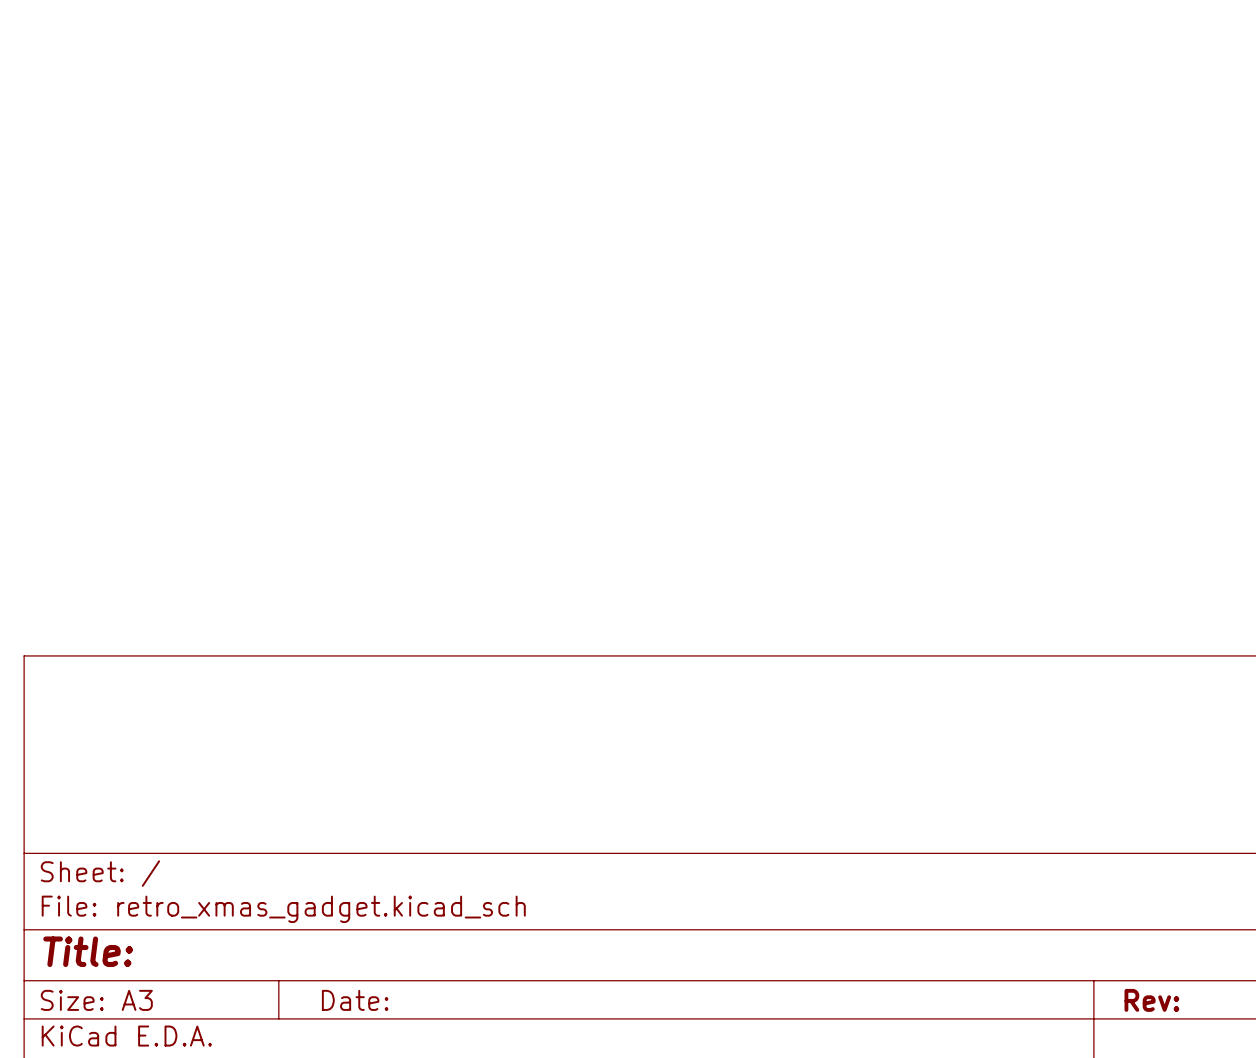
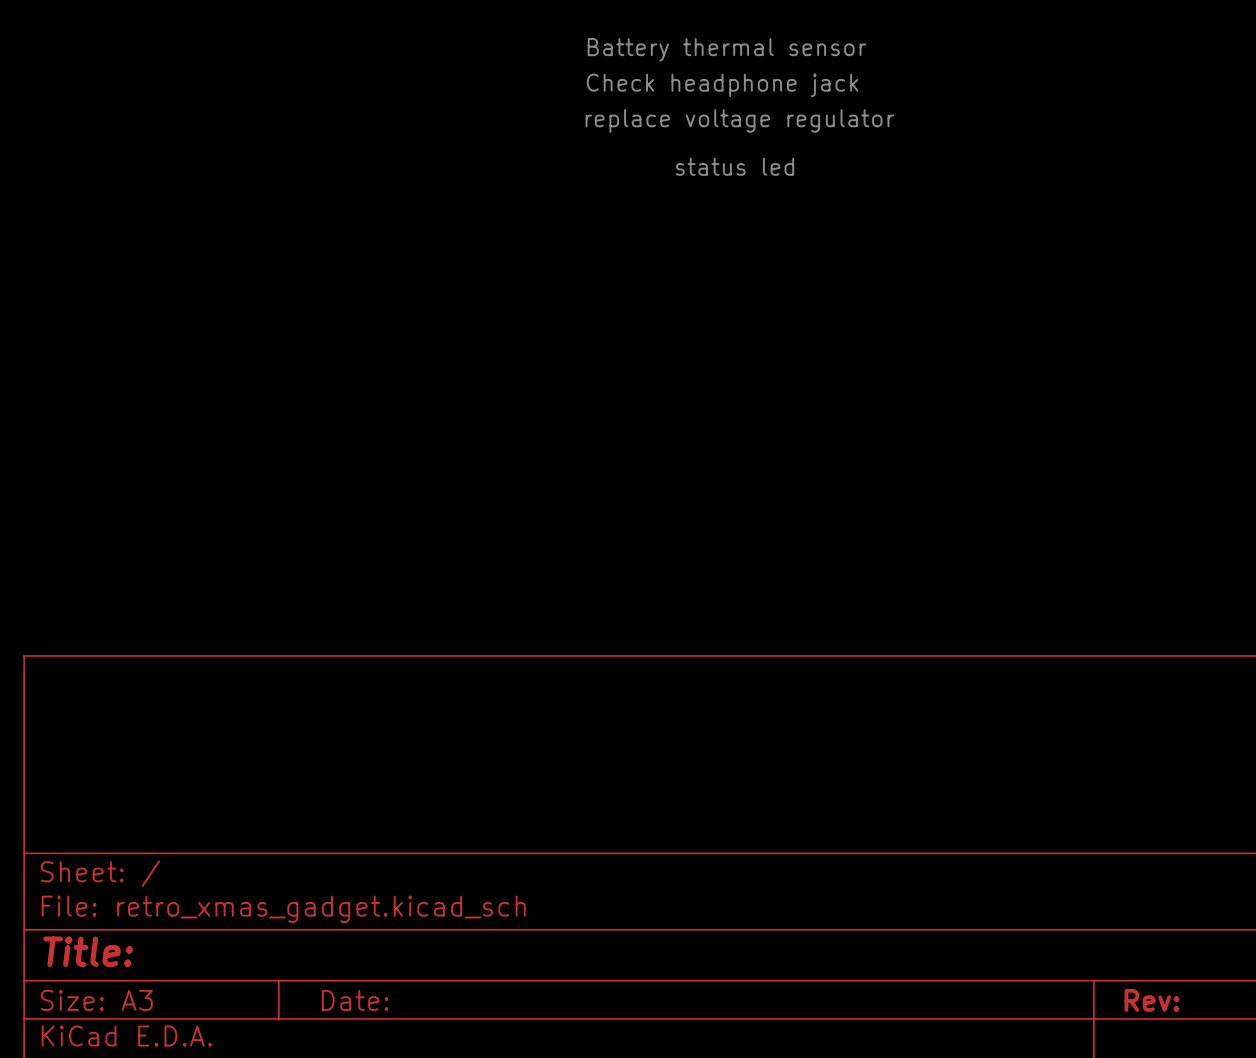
text: none -> Battery thermal sensor (726, 49)
text: none -> Check headphone jack (722, 85)
text: none -> replace voltage regulator (739, 120)
text: none -> status led (735, 166)

